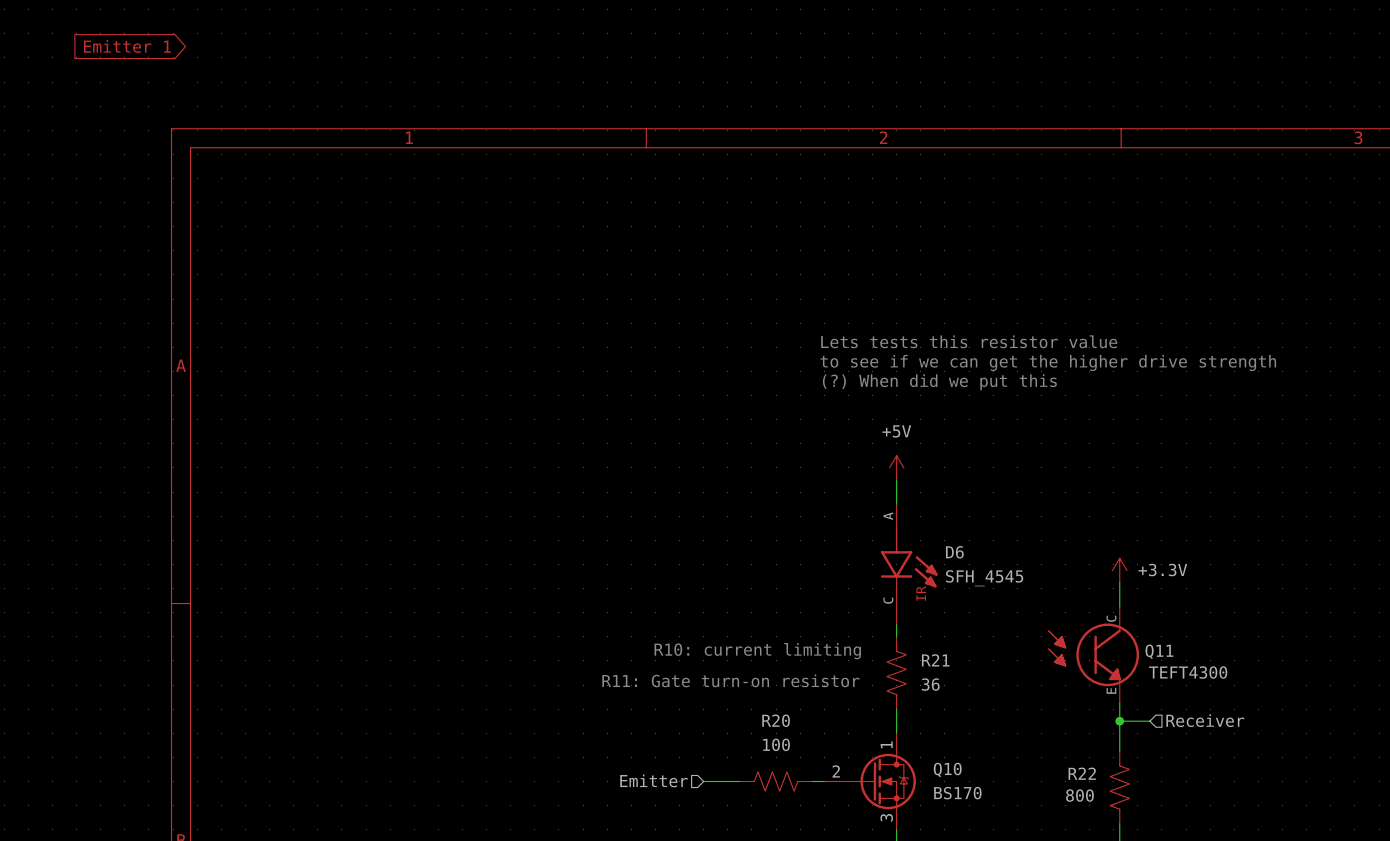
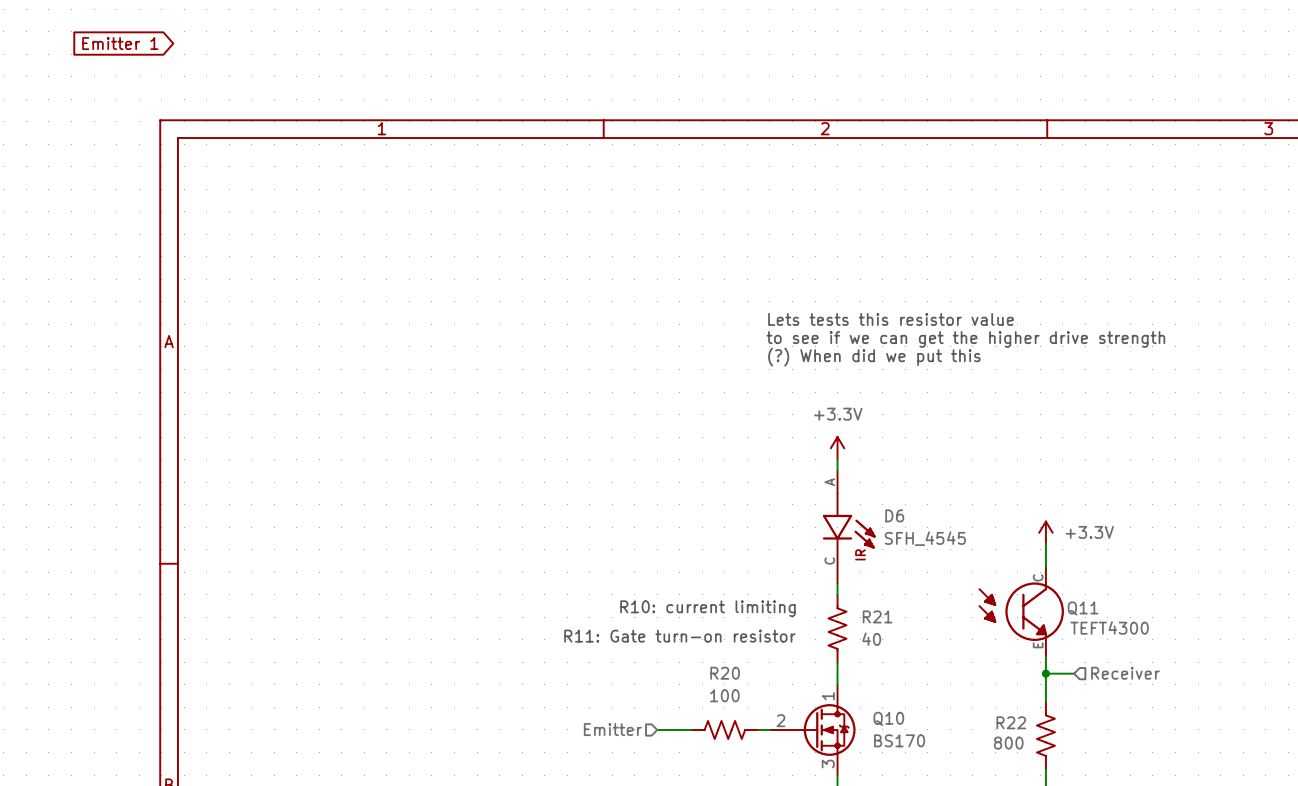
power symbol: +5V (896, 467) -> none
power symbol: none -> +3.3V (837, 448)
R21 value: 36 (930, 684) -> 40 (871, 639)

